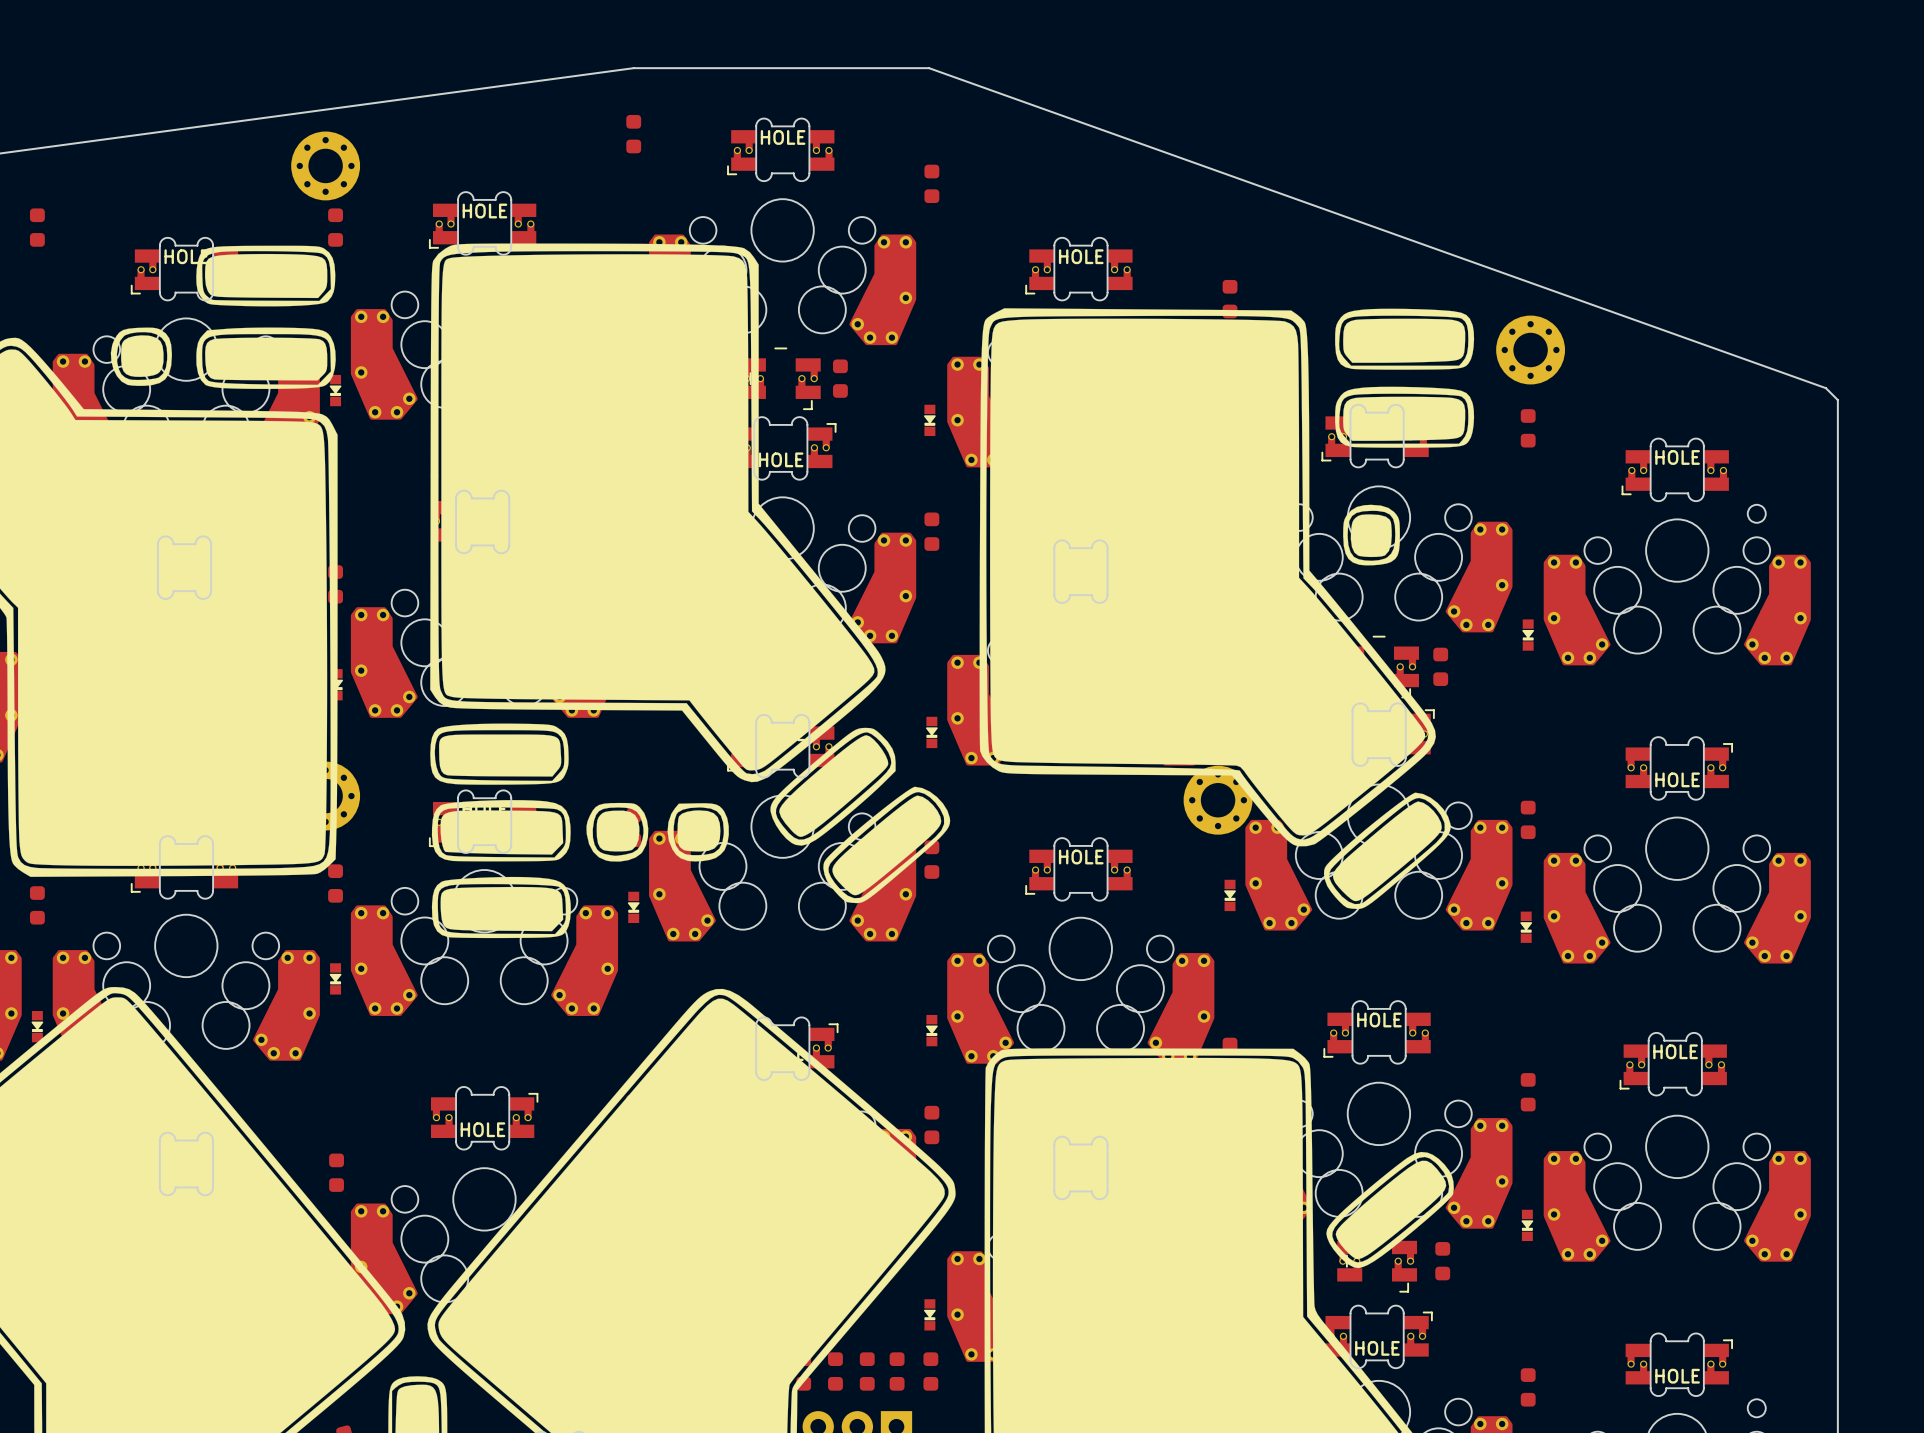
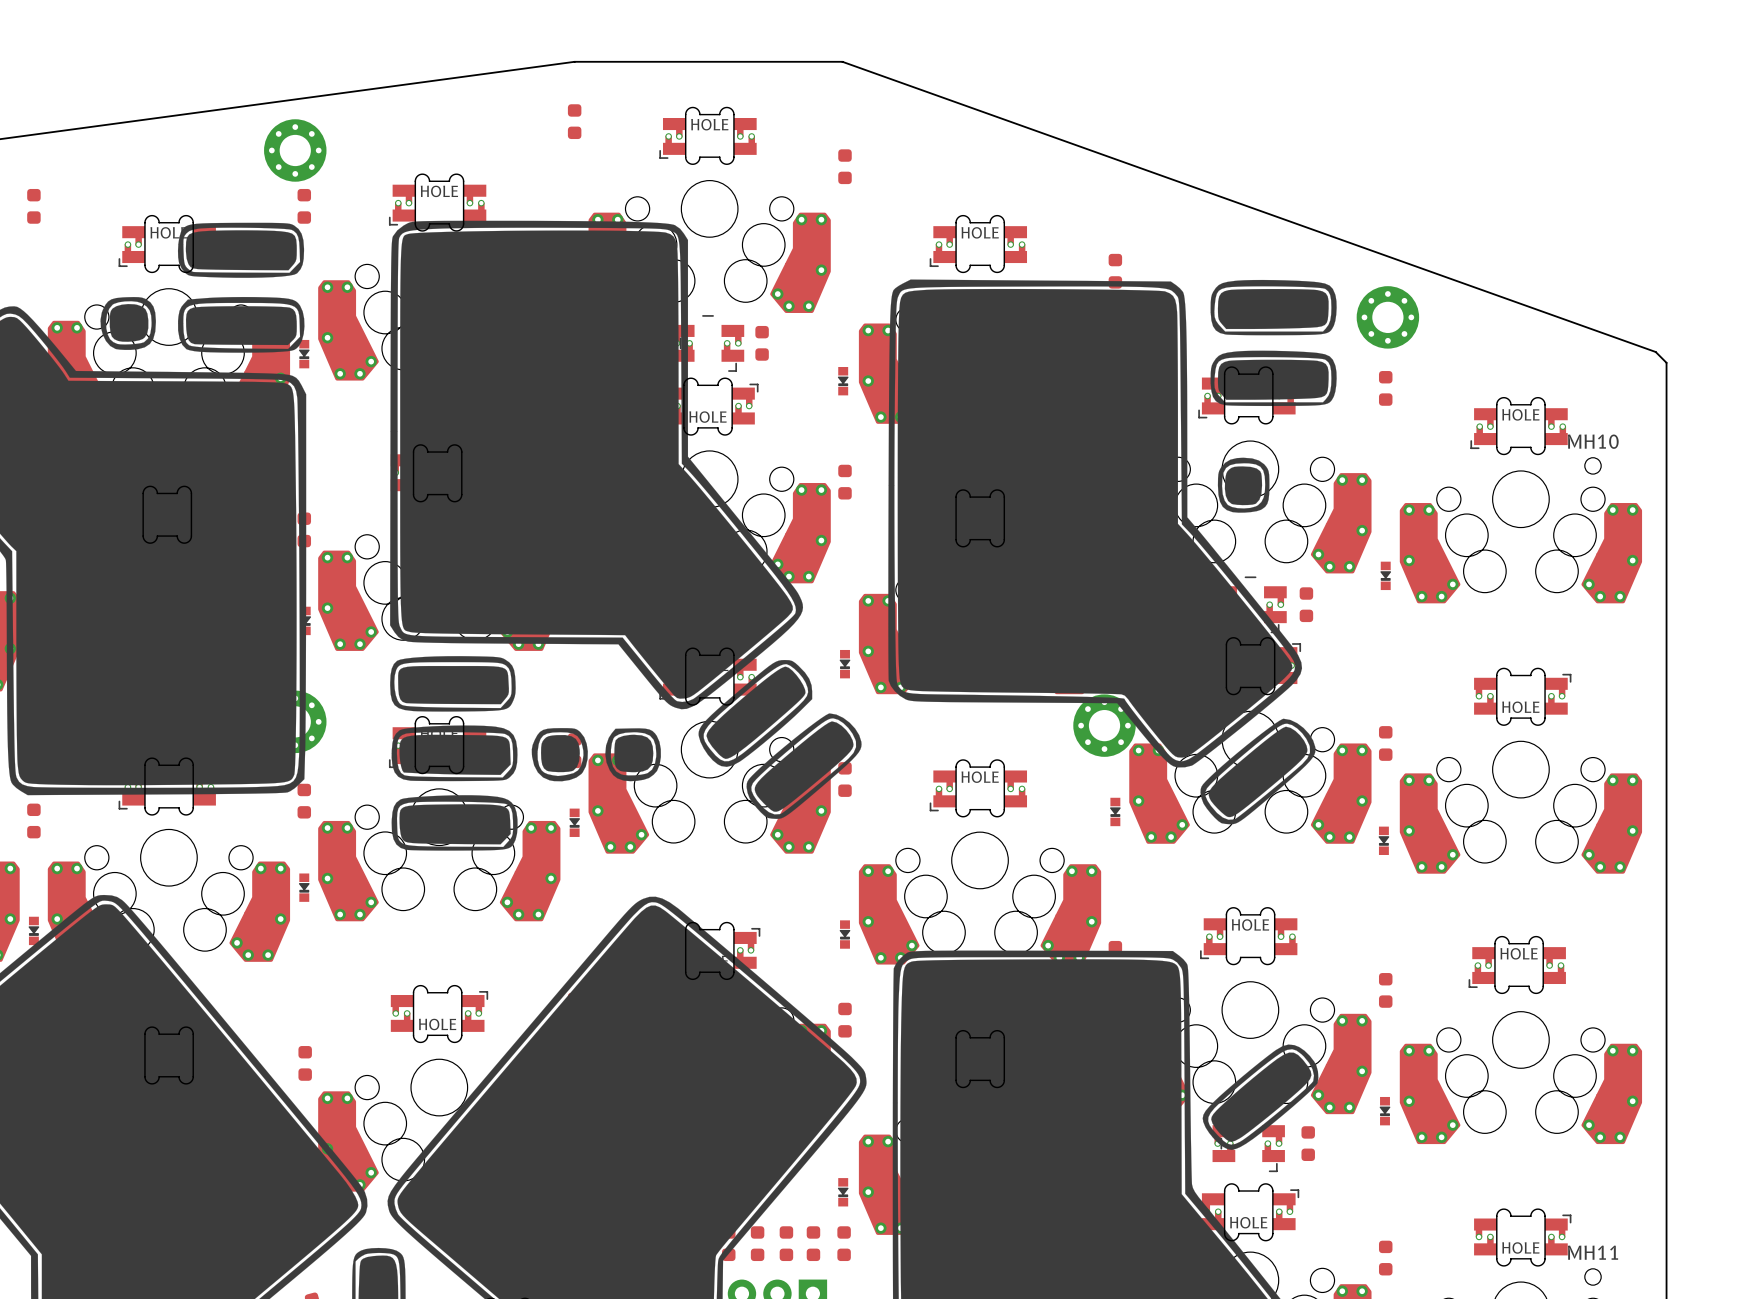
MH10 name: none -> MH10 (1593, 441)
MH11 name: none -> MH11 (1592, 1252)

